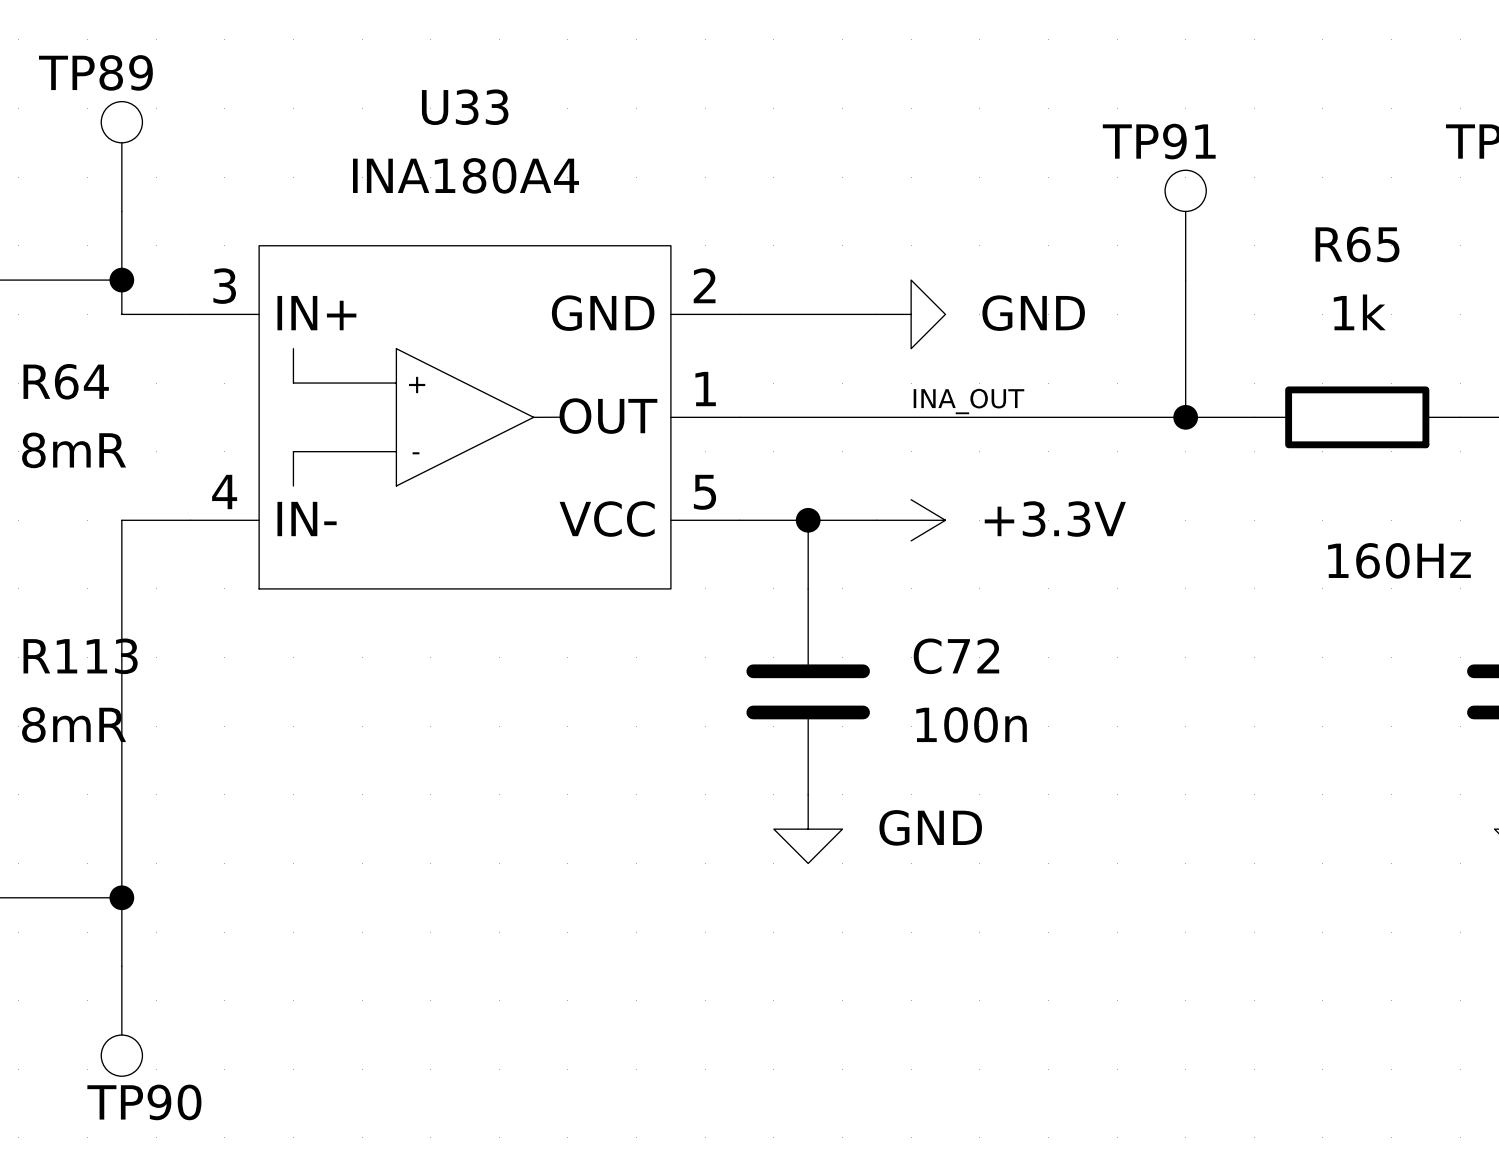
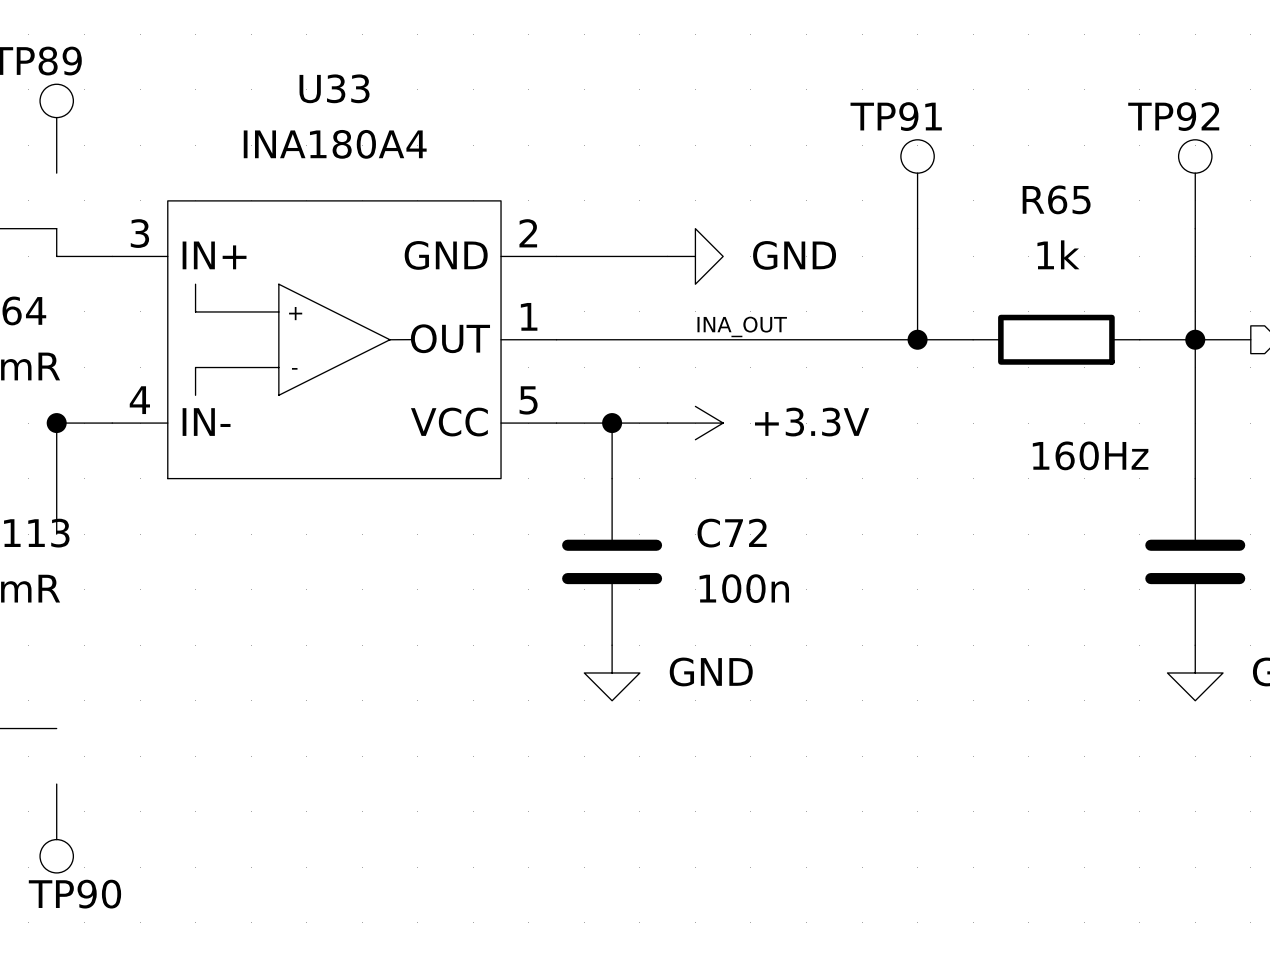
wire: (121, 211) (121, 280) -> none
junction: (121, 280) -> none
junction: none -> (56, 423)
wire: (121, 657) (121, 966) -> none
junction: (121, 897) -> none

